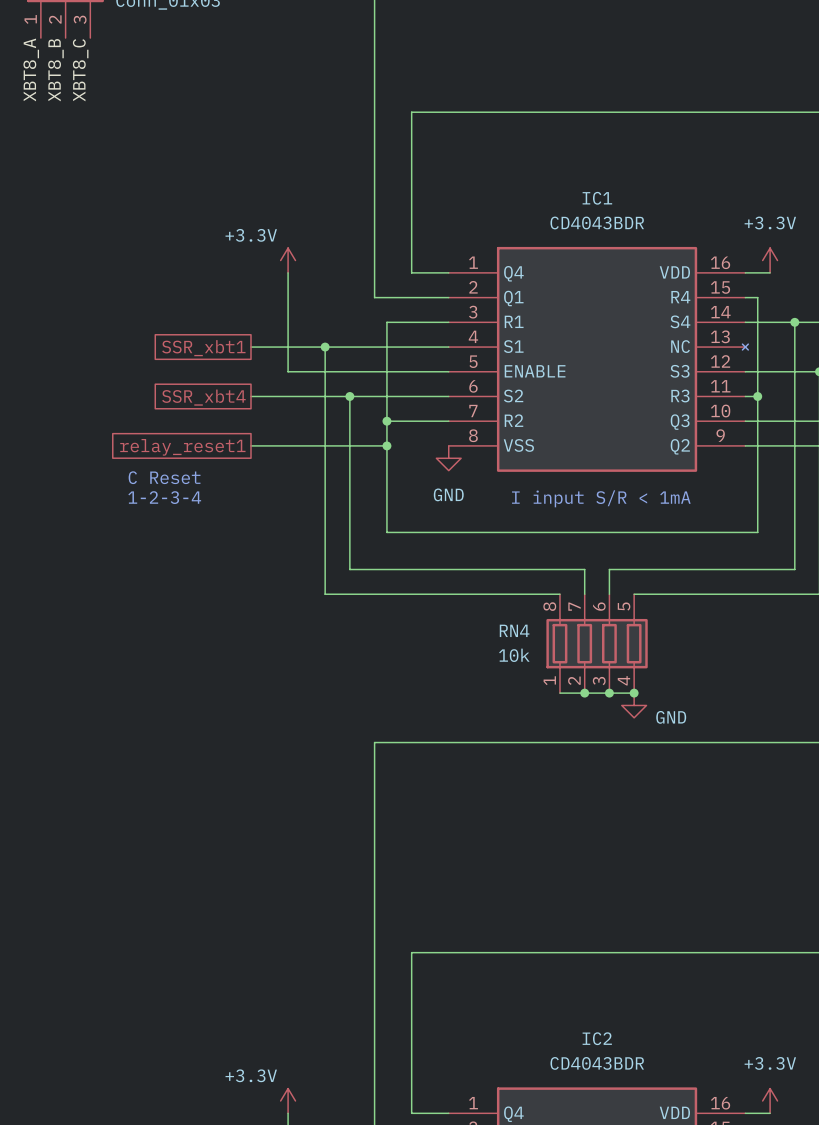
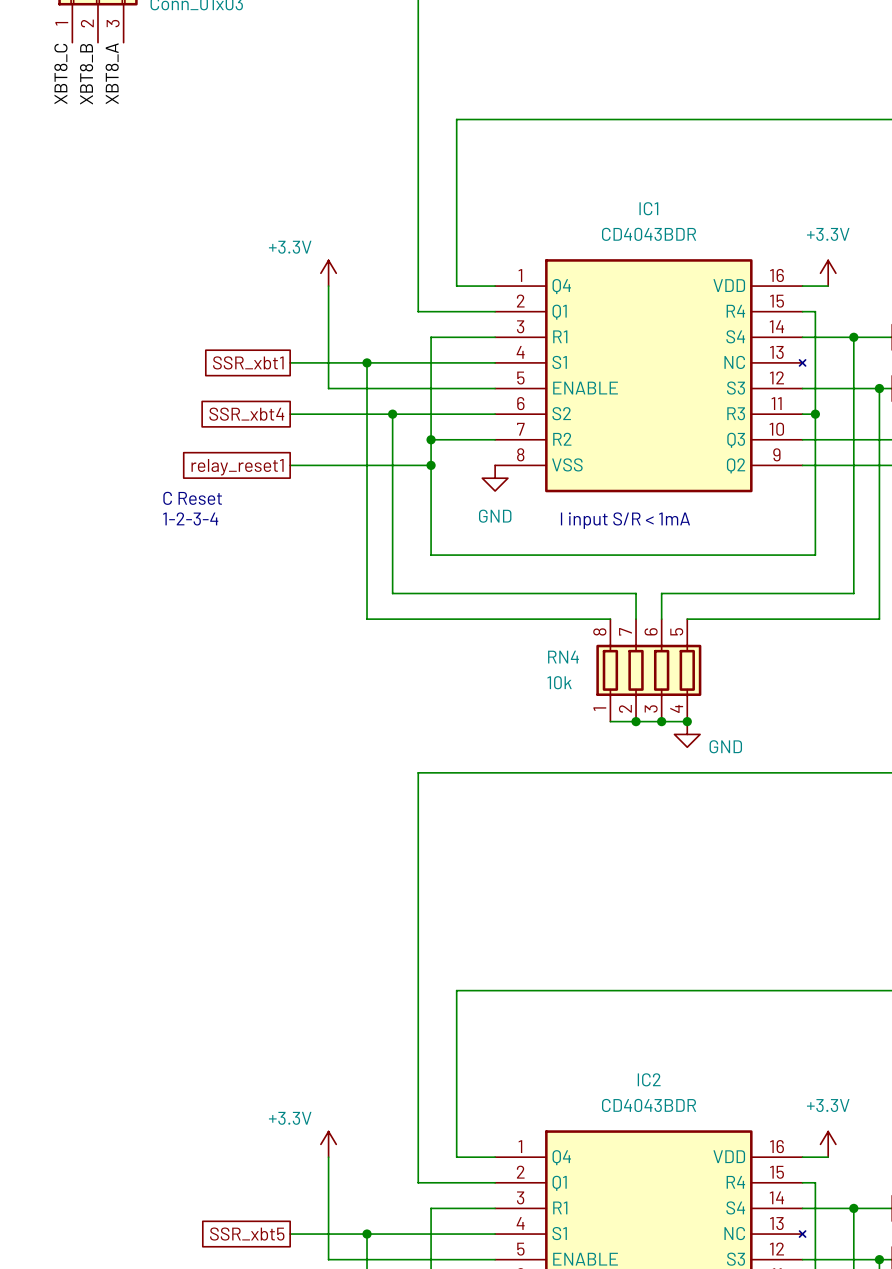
label: XBT8_A (31, 69) -> XBT8_C (60, 73)
label: XBT8_C (80, 70) -> XBT8_A (112, 73)

